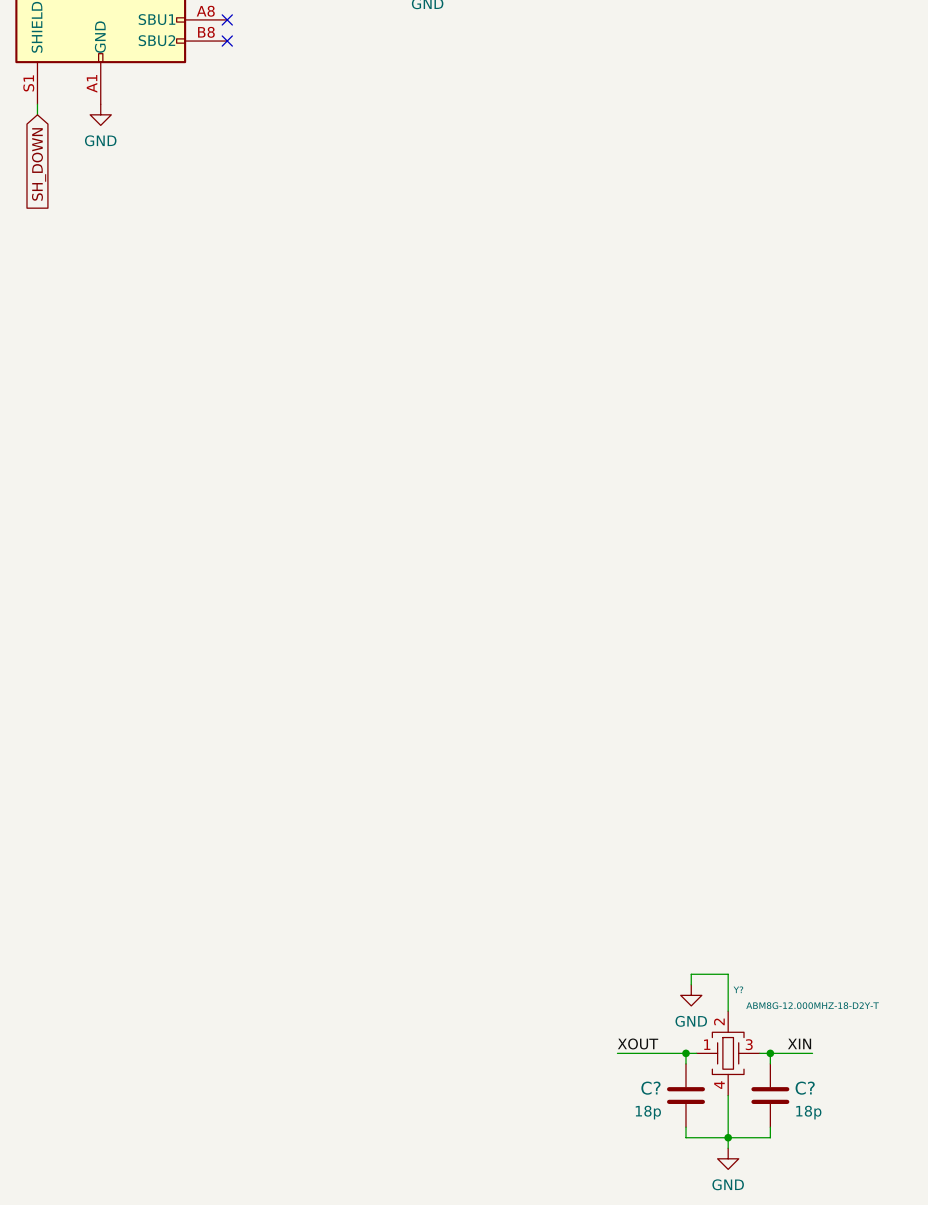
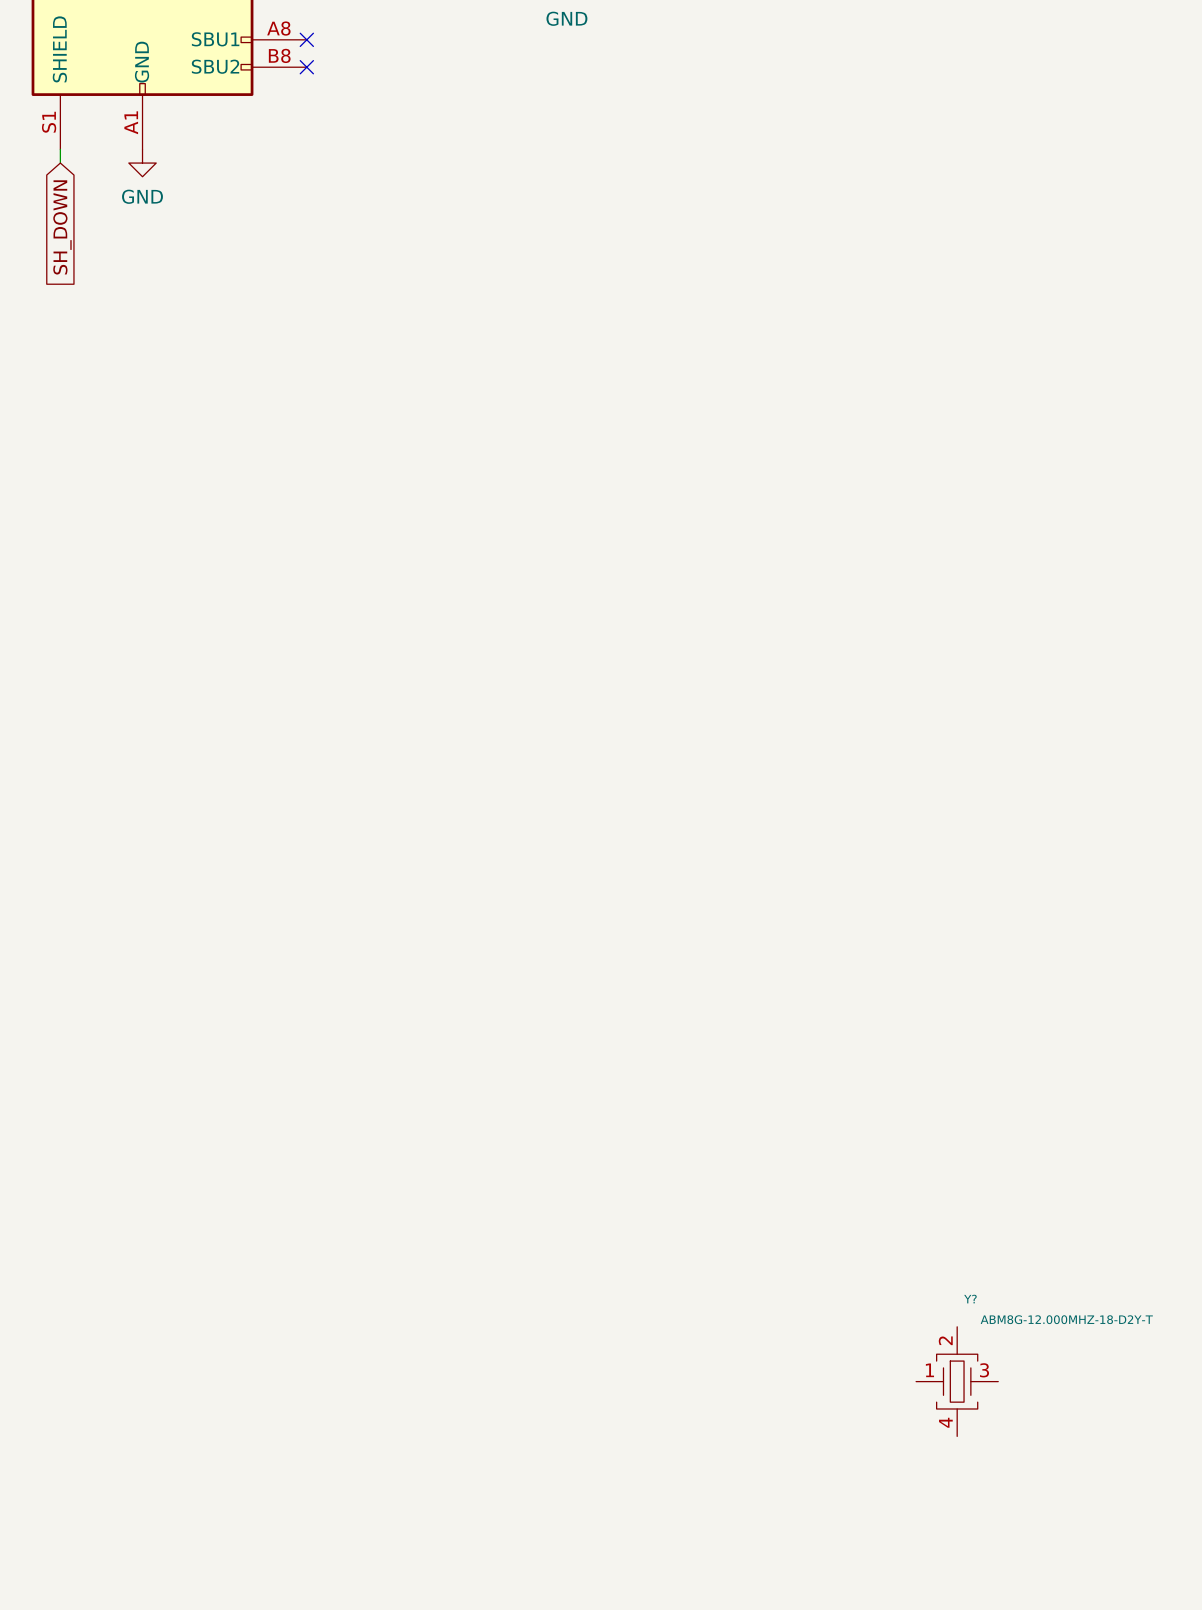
wire: (691, 984) (691, 974) (728, 974) (728, 1011) -> none
power symbol: GND (691, 995) -> none
label: XOUT (638, 1043) -> none
label: XIN (799, 1043) -> none
wire: (617, 1053) (696, 1053) -> none
wire: (685, 1053) (685, 1063) -> none
junction: (685, 1053) -> none
wire: (759, 1053) (812, 1053) -> none
wire: (770, 1053) (770, 1063) -> none
junction: (770, 1053) -> none
C?: (685, 1095) -> none
wire: (728, 1095) (728, 1148) -> none
C?: (770, 1095) -> none
wire: (685, 1127) (685, 1137) (770, 1137) (770, 1127) -> none
junction: (728, 1137) -> none
power symbol: GND (728, 1158) -> none

